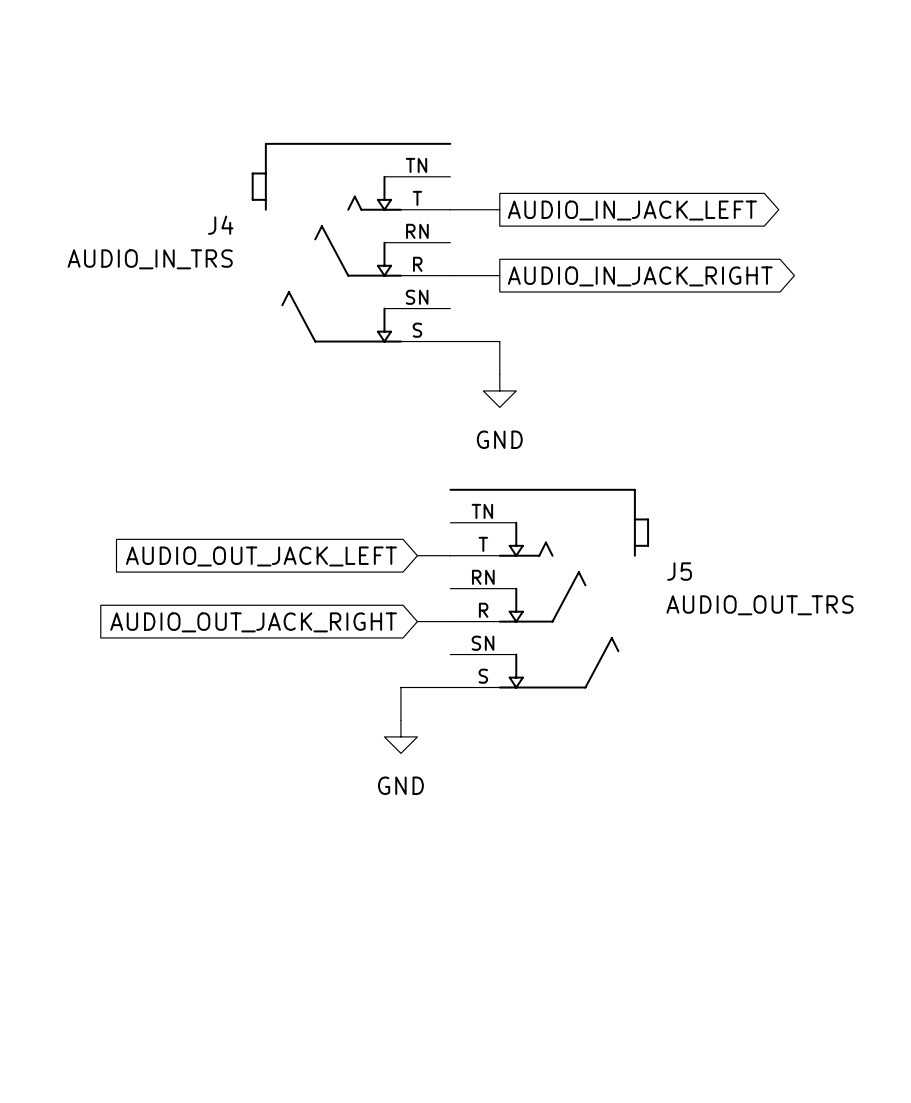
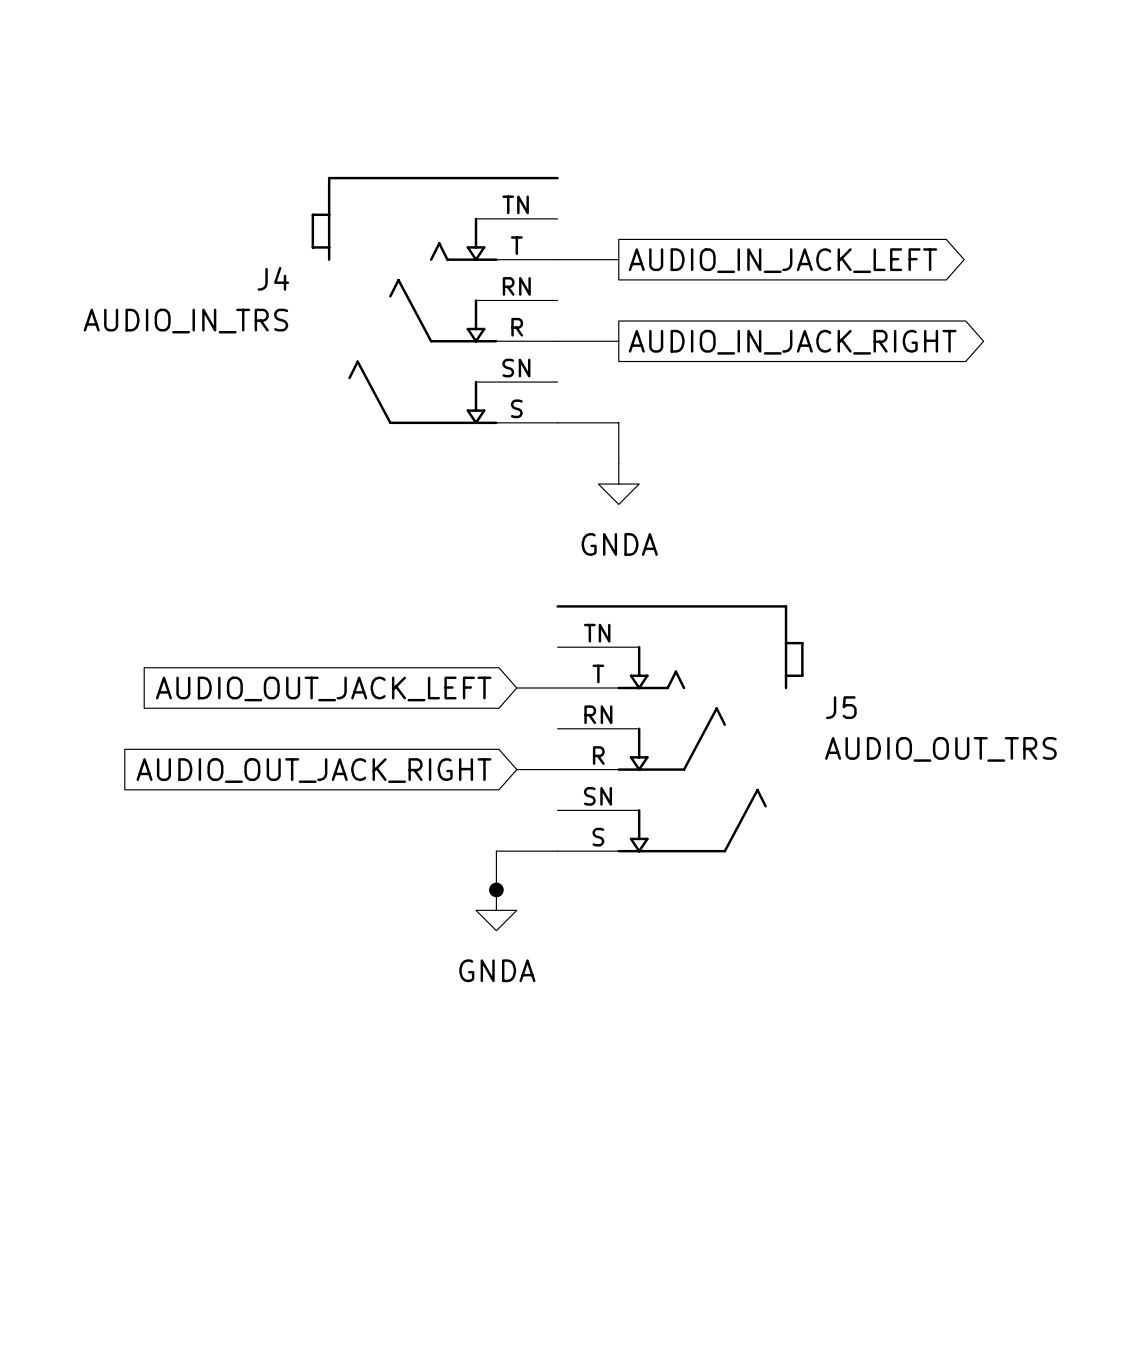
power symbol: GND (499, 390) -> GNDA (618, 484)
junction: none -> (496, 889)
power symbol: GND (400, 736) -> GNDA (496, 910)

